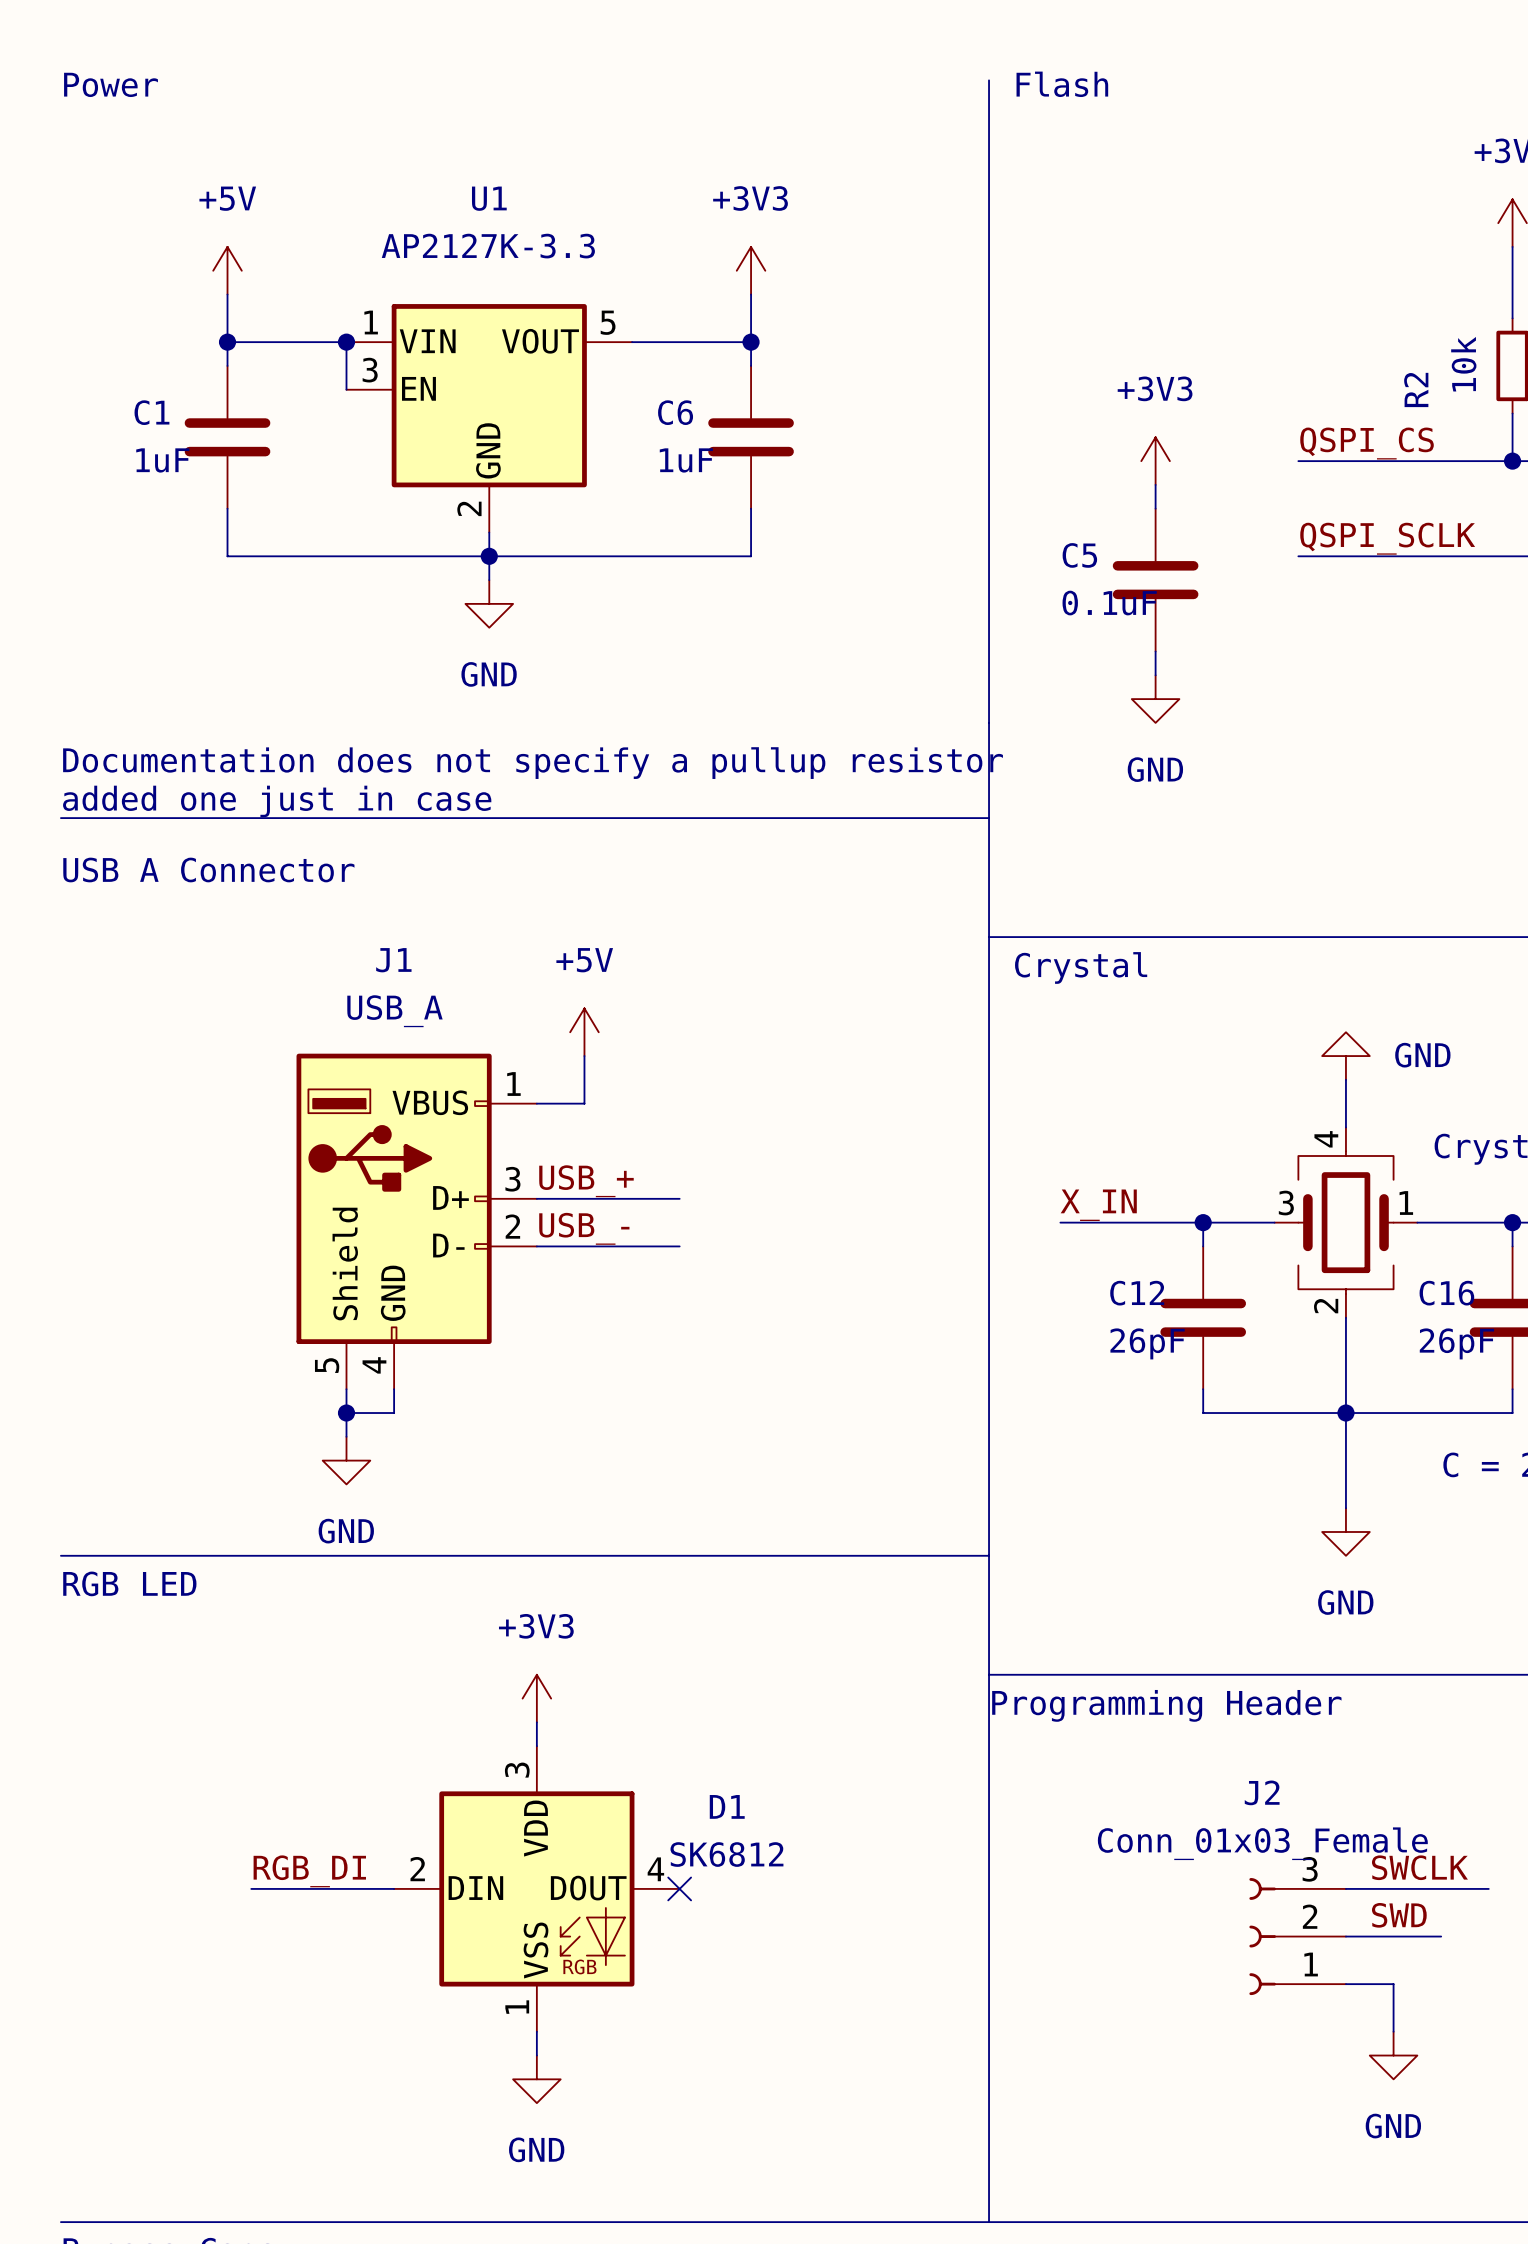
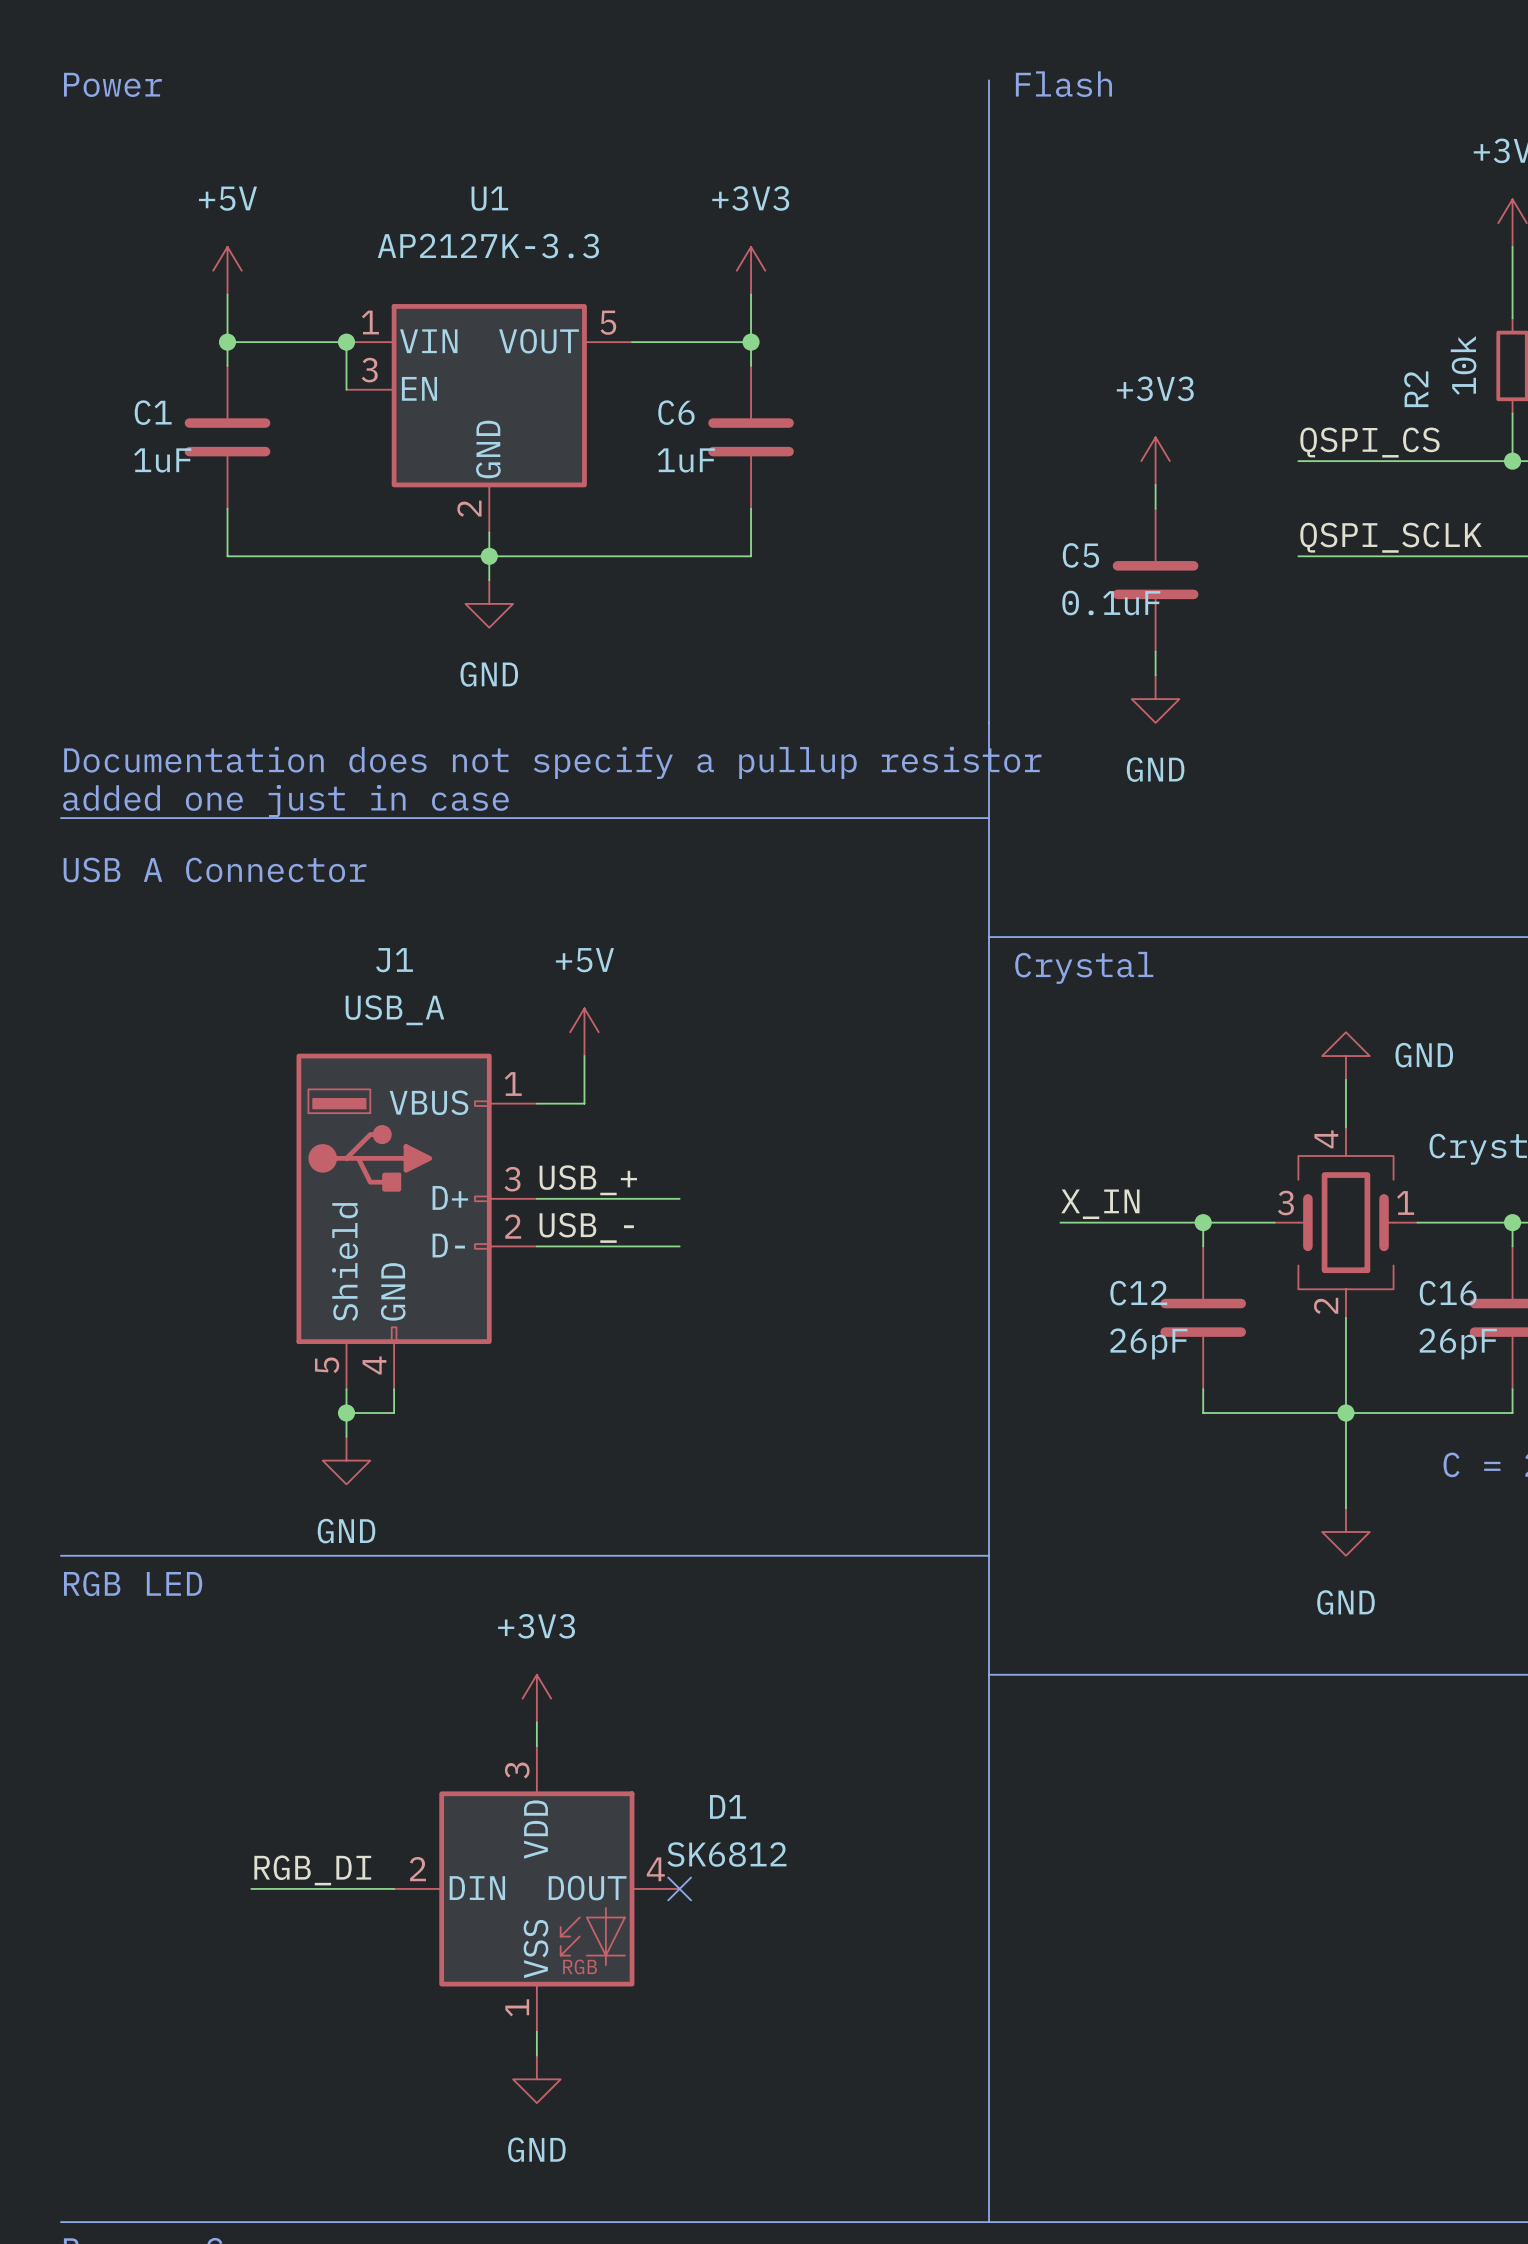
text: Programming Header (1166, 1705) -> none
label: SWCLK (1419, 1867) -> none
wire: (1345, 1888) (1488, 1888) -> none
label: SWD (1399, 1915) -> none
J2: Conn_01x03_Female (1297, 1936) -> none
wire: (1345, 1936) (1441, 1936) -> none
wire: (1345, 1984) (1393, 1984) (1393, 2031) -> none
power symbol: GND (1393, 2055) -> none

